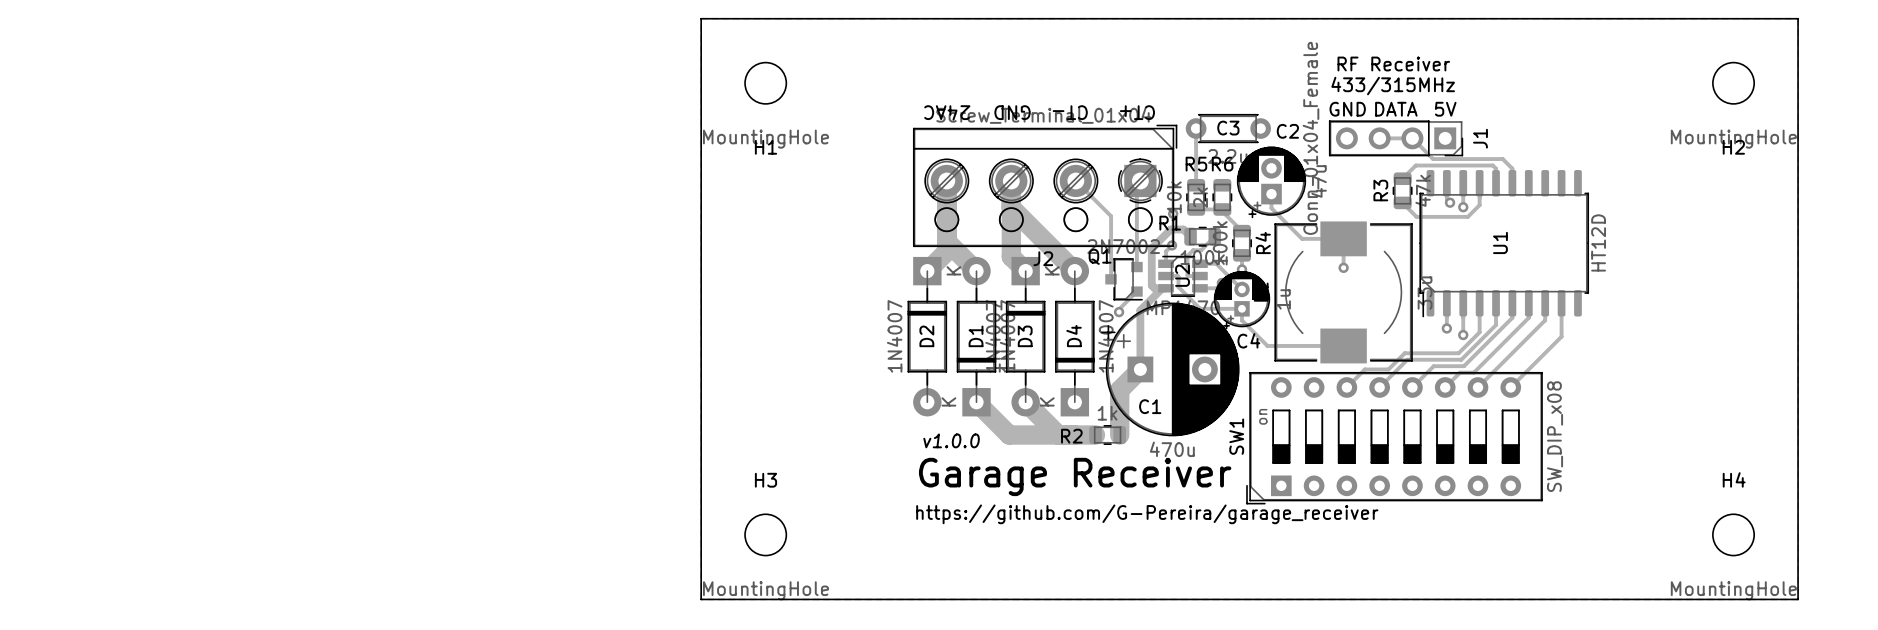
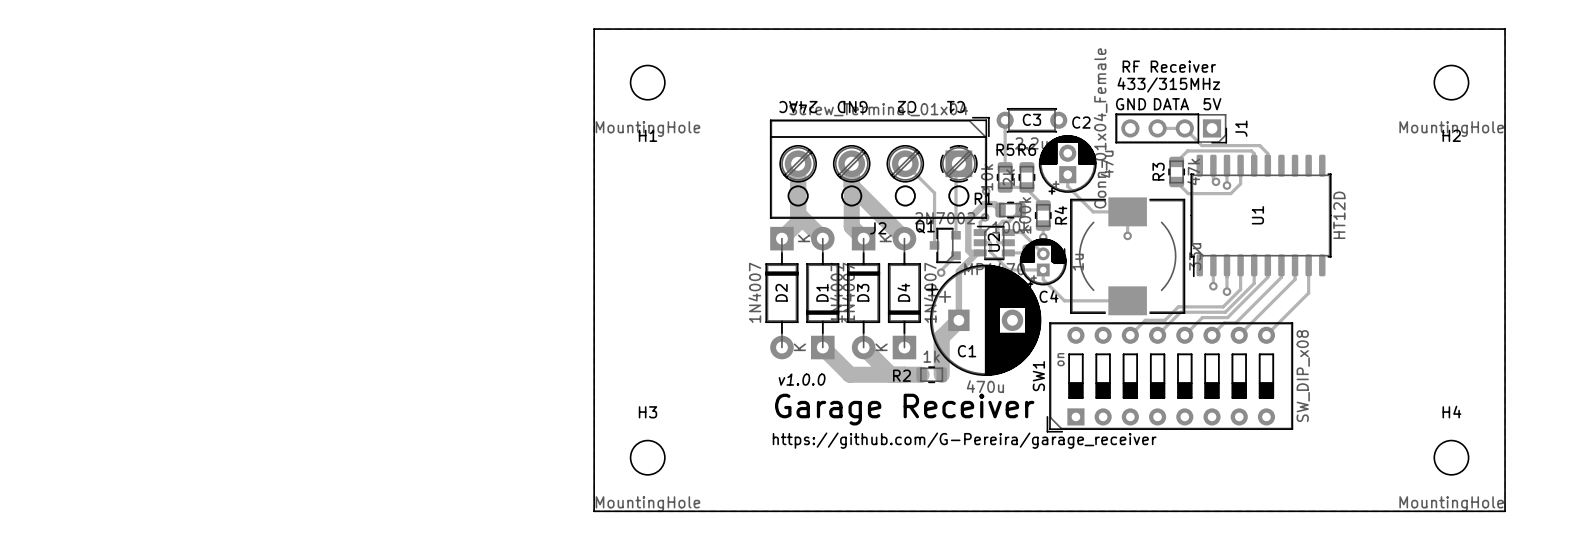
text: CT- (1070, 112) -> C2 (907, 107)
text: CT+ (1137, 112) -> C1 (956, 107)

